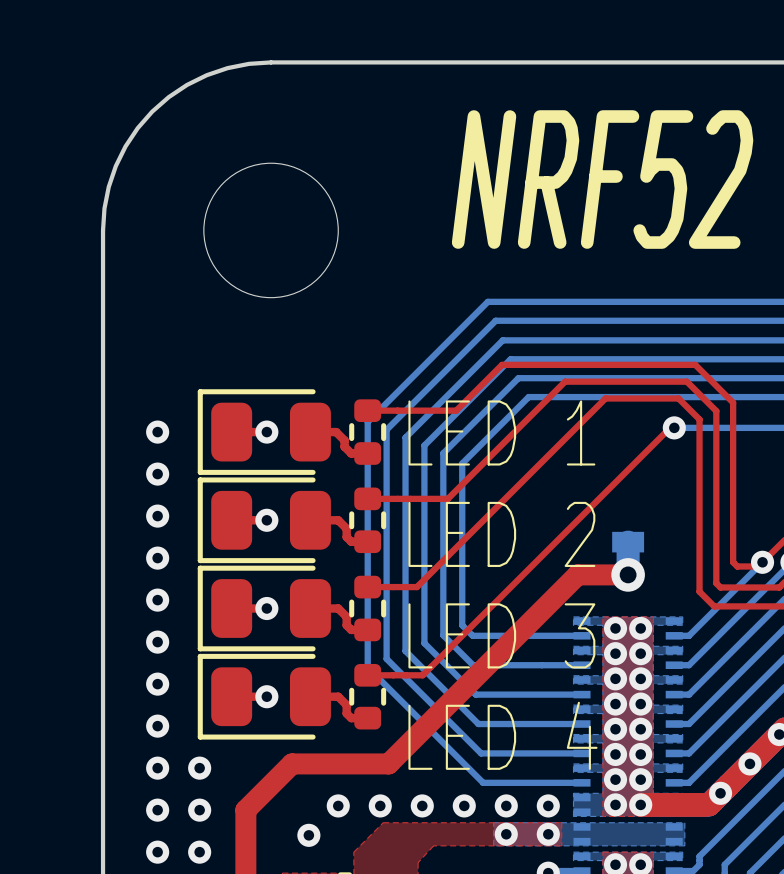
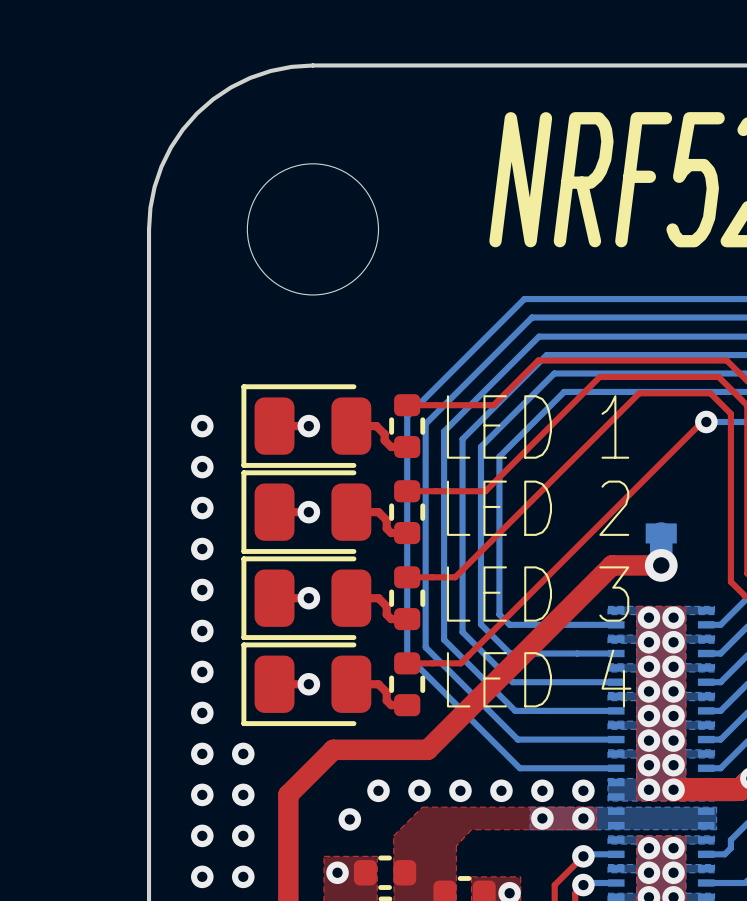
text position: LED 2 (501, 534) -> LED 2 (538, 508)
text position: LED 3 (501, 635) -> LED 3 (538, 594)
text position: LED 4 (502, 735) -> LED 4 (539, 678)

